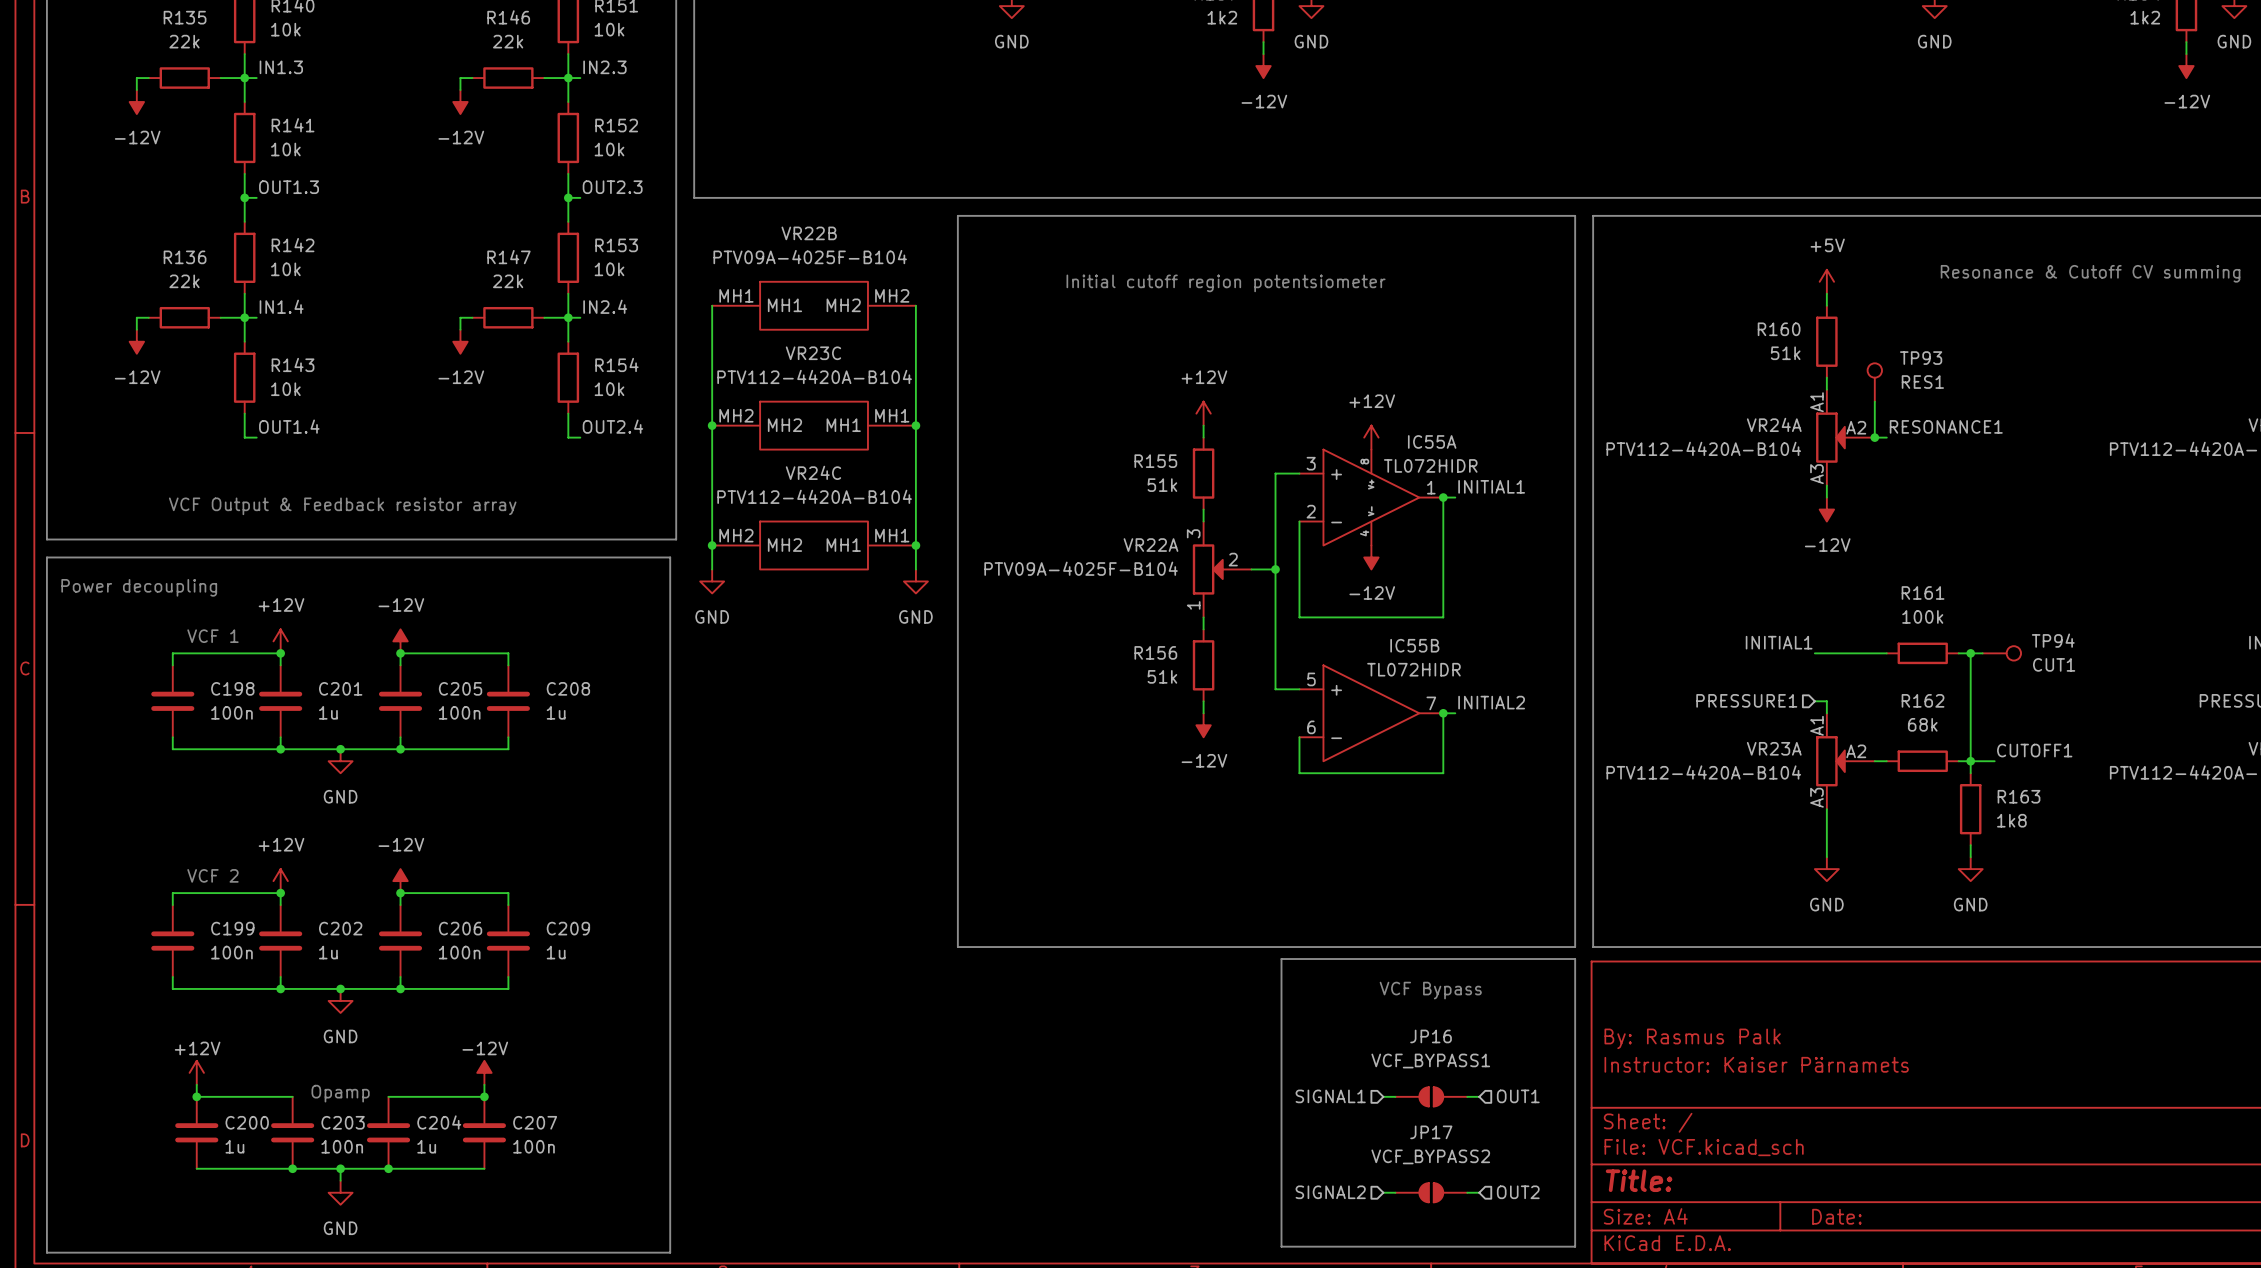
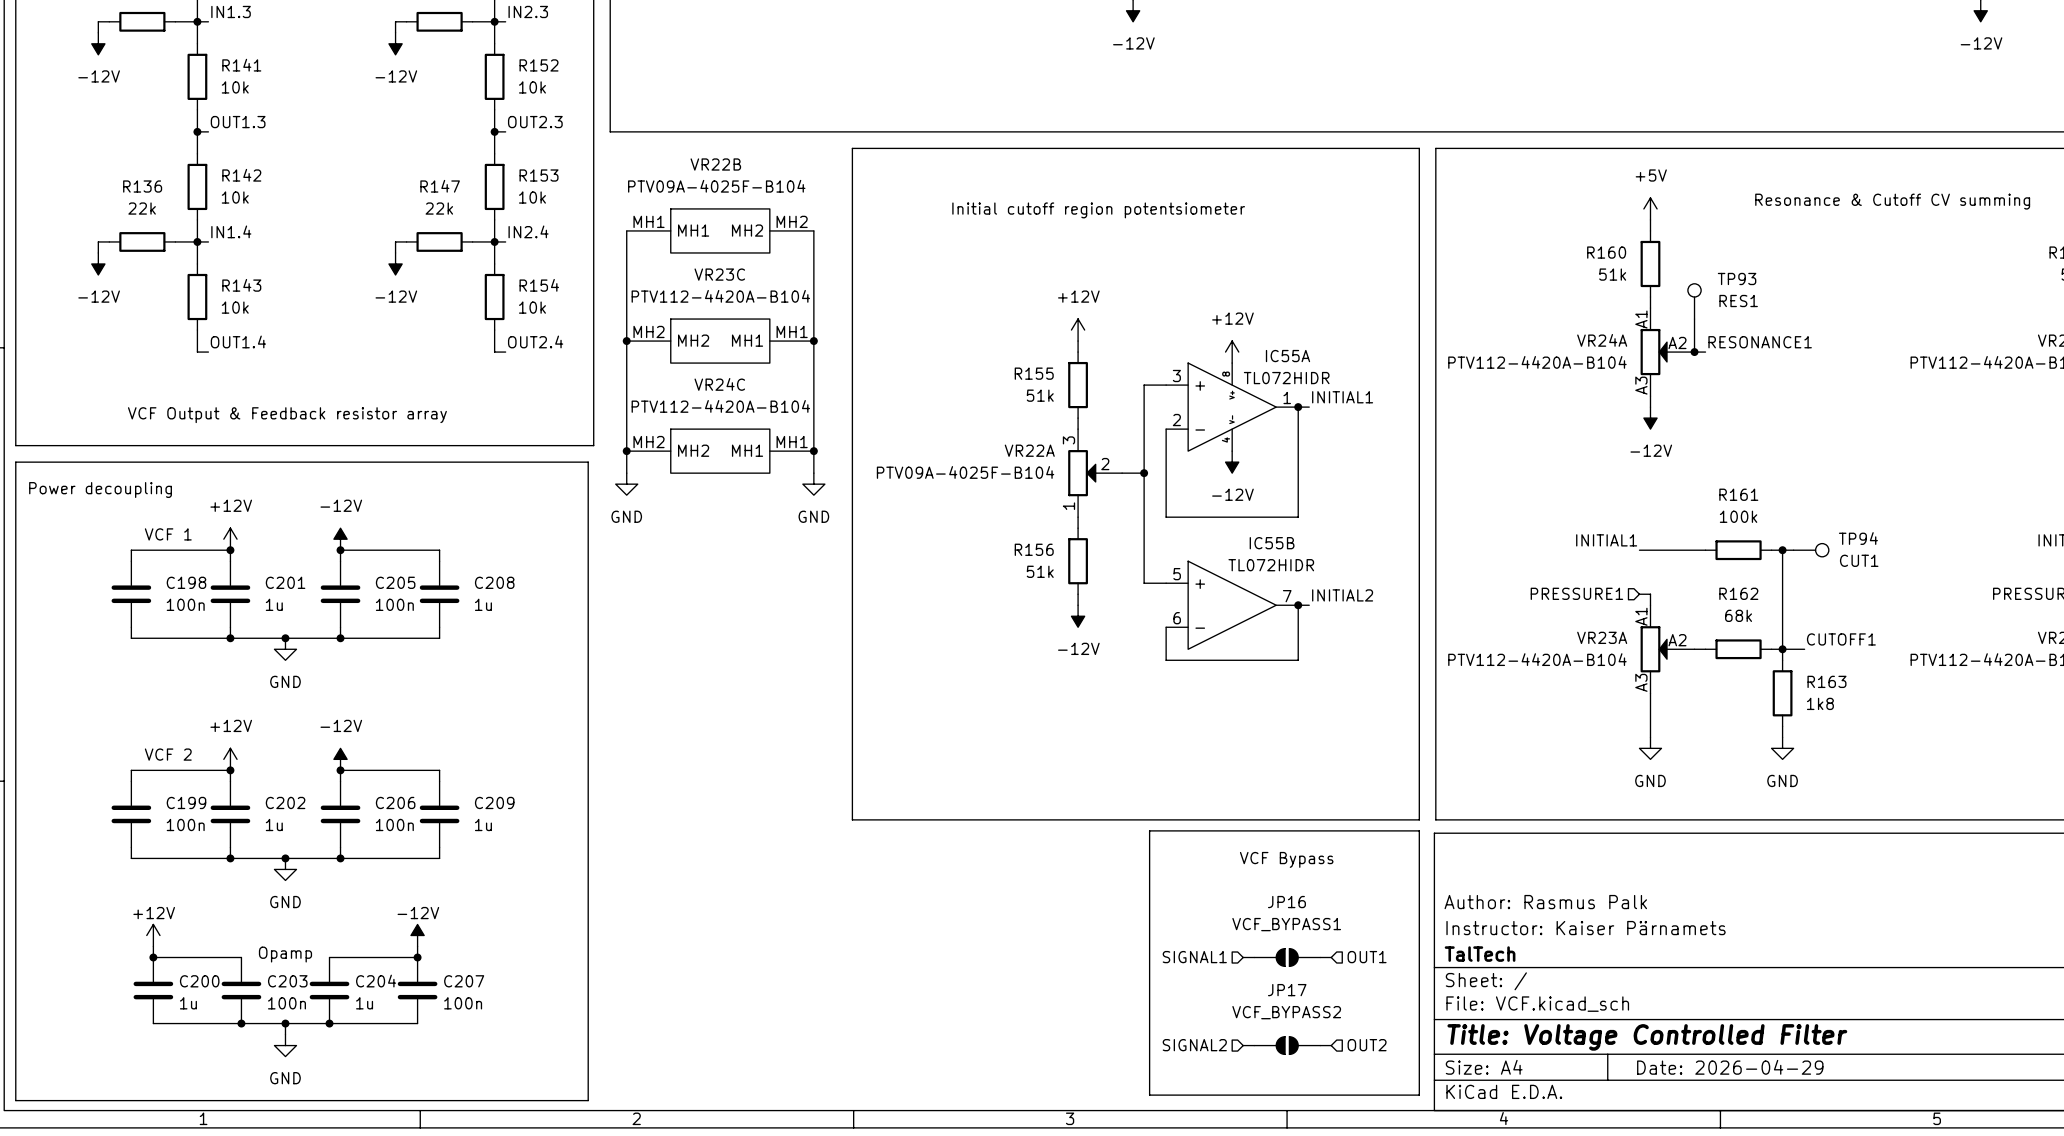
title block: By: Rasmus Palk (1692, 1038) -> Author: Rasmus Palk (1545, 902)
title block: none -> TalTech (1480, 954)
title block: Title: (1639, 1180) -> Title: Voltage Controlled Filter (1647, 1037)
title block: Date: (1836, 1216) -> Date: 2026-04-29 (1730, 1067)

